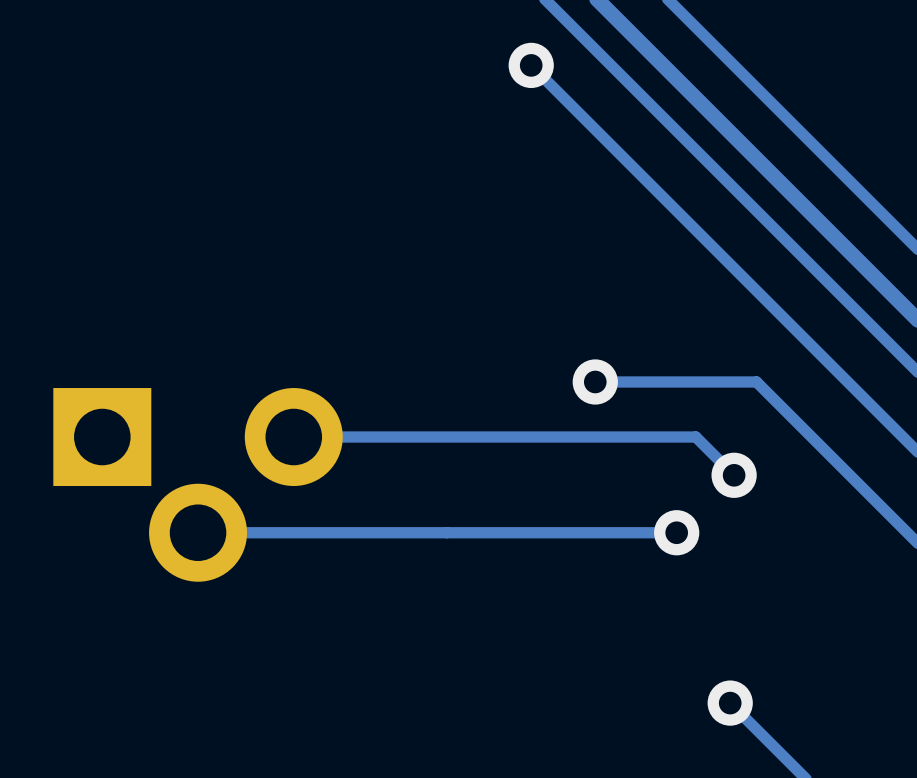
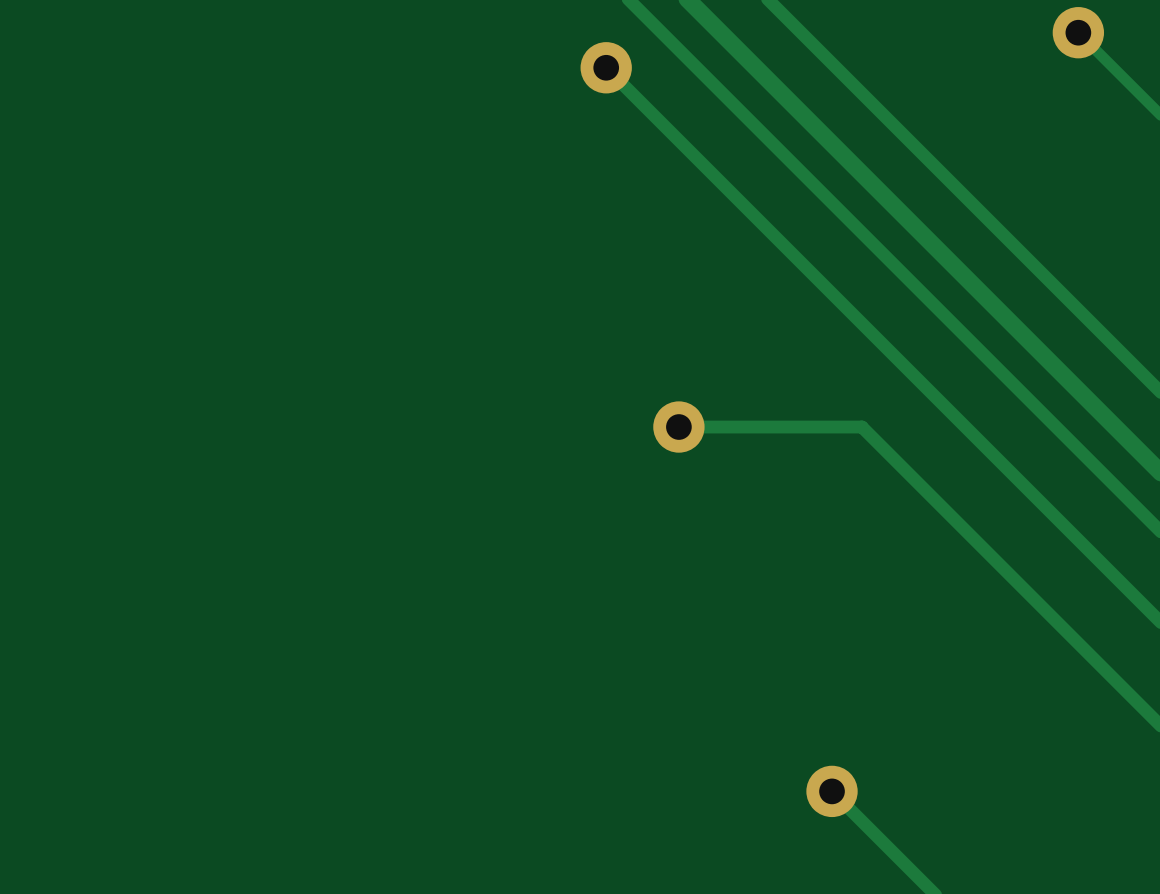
track: (293, 437) (695, 437) (734, 475) -> none
via: (734, 475) -> none
part: (198, 484) -> none
track: (676, 532) (198, 532) -> none
via: (676, 532) -> none

